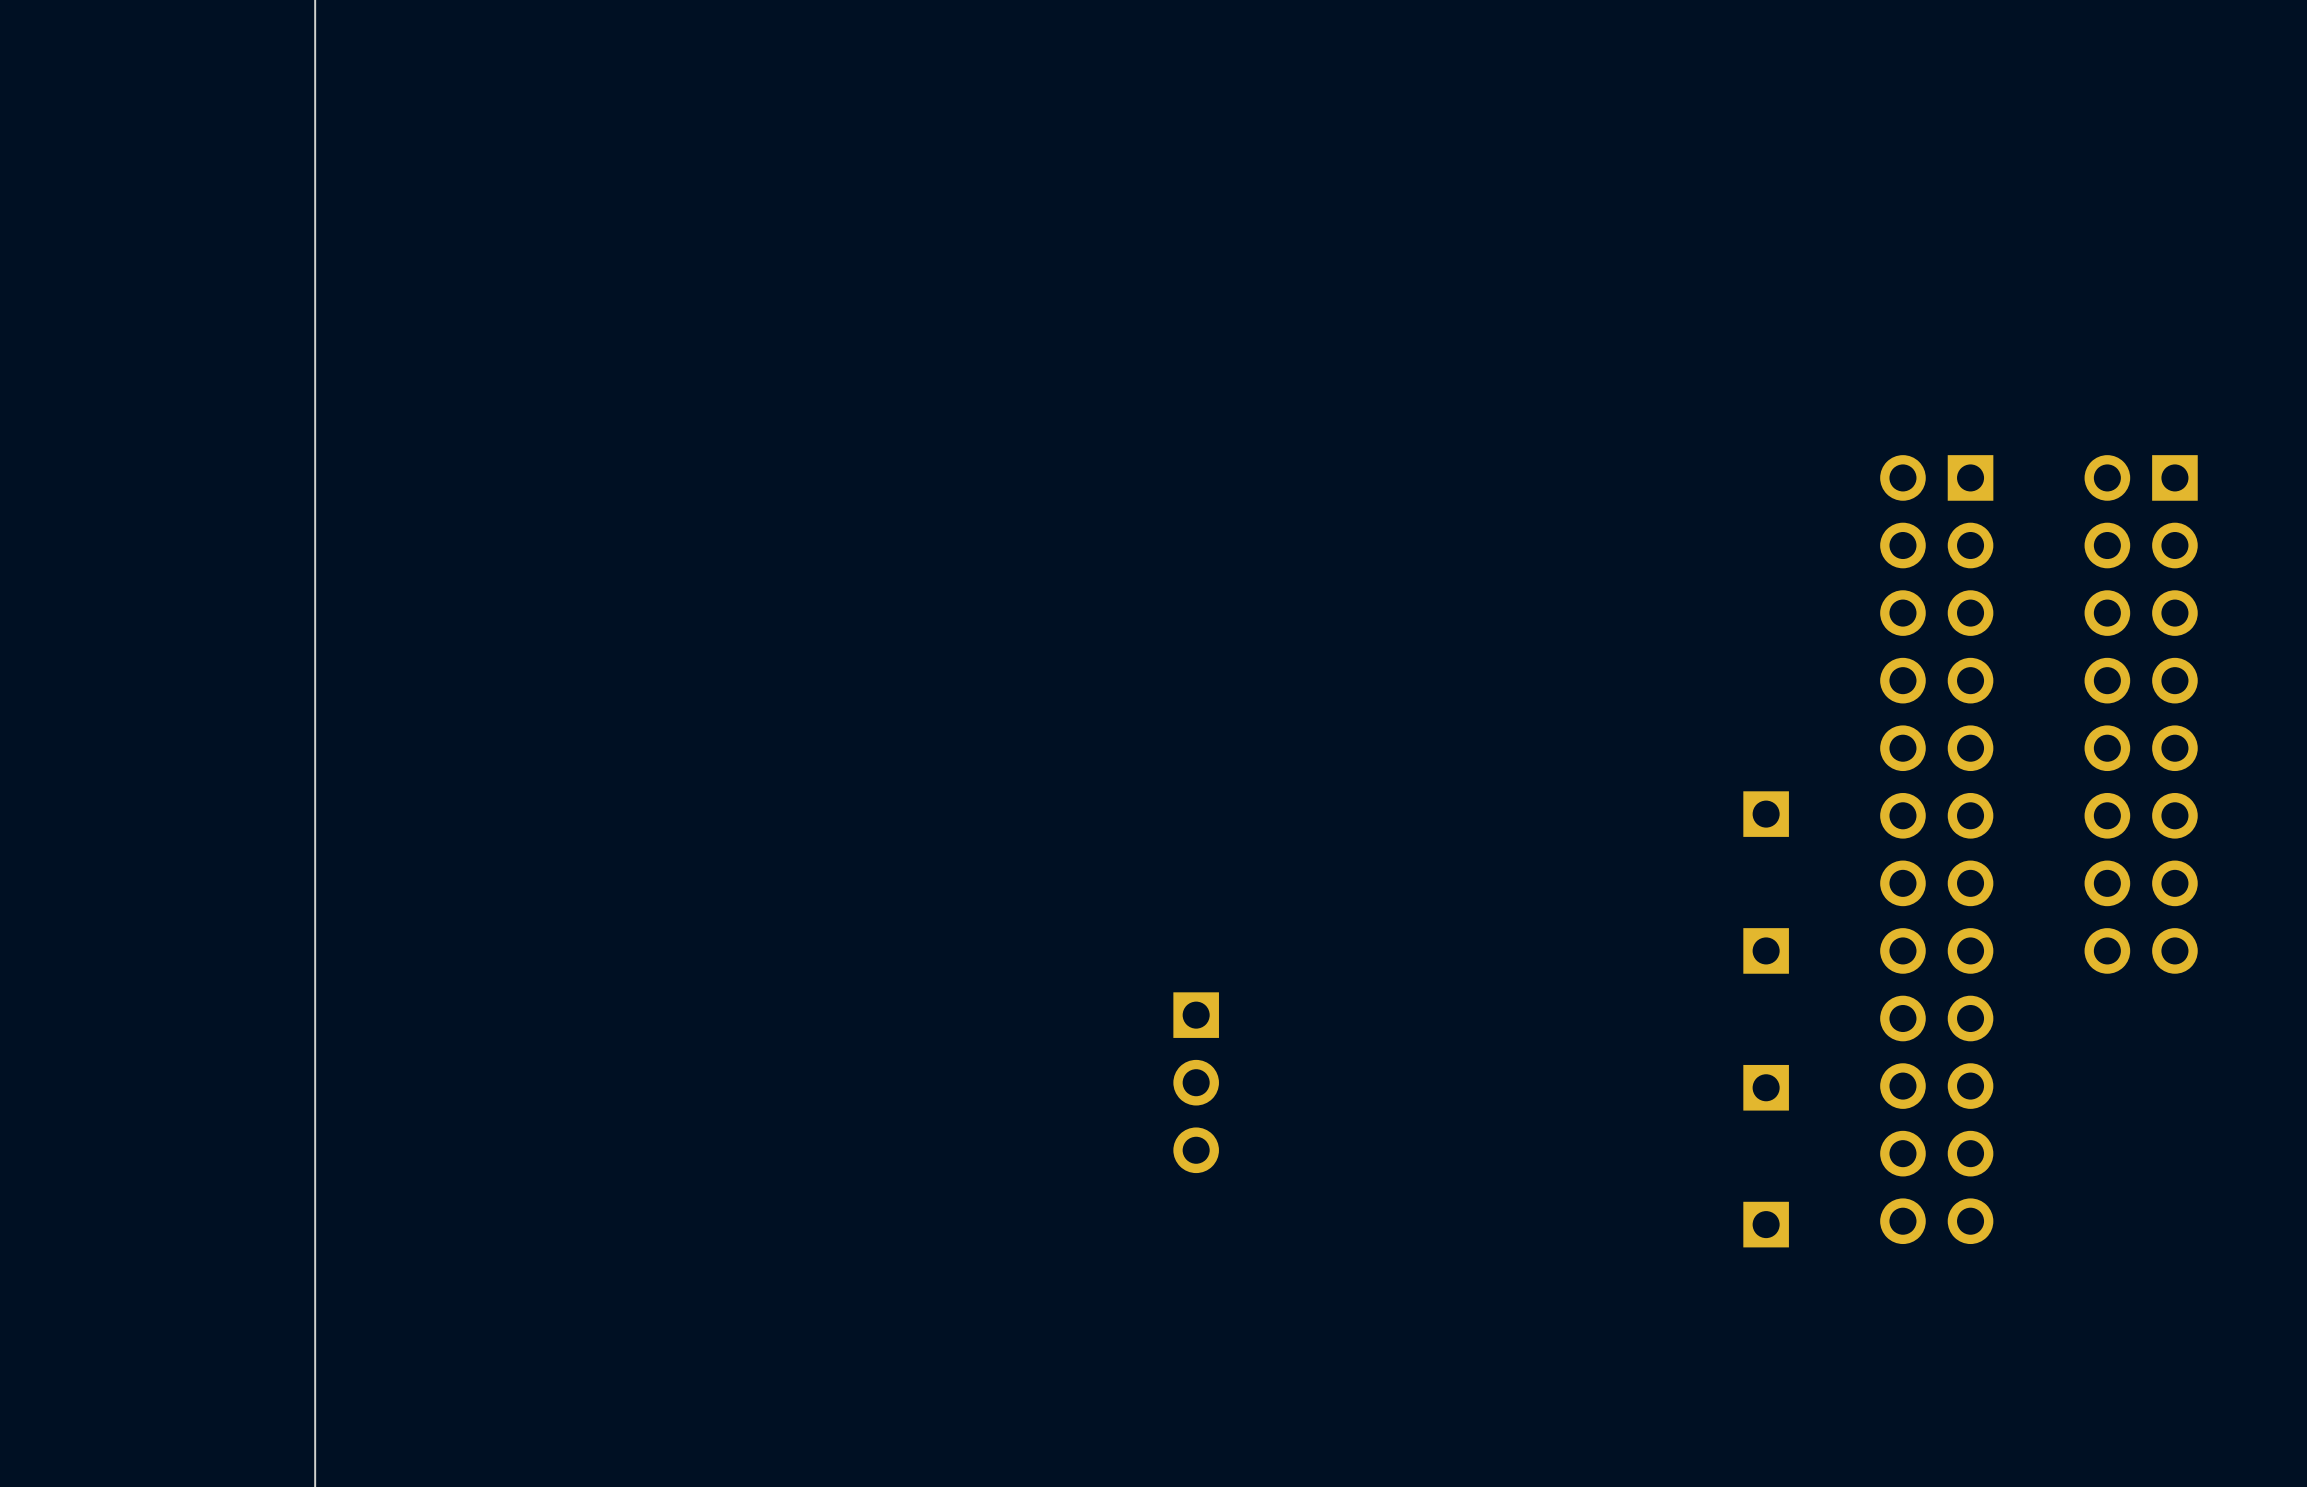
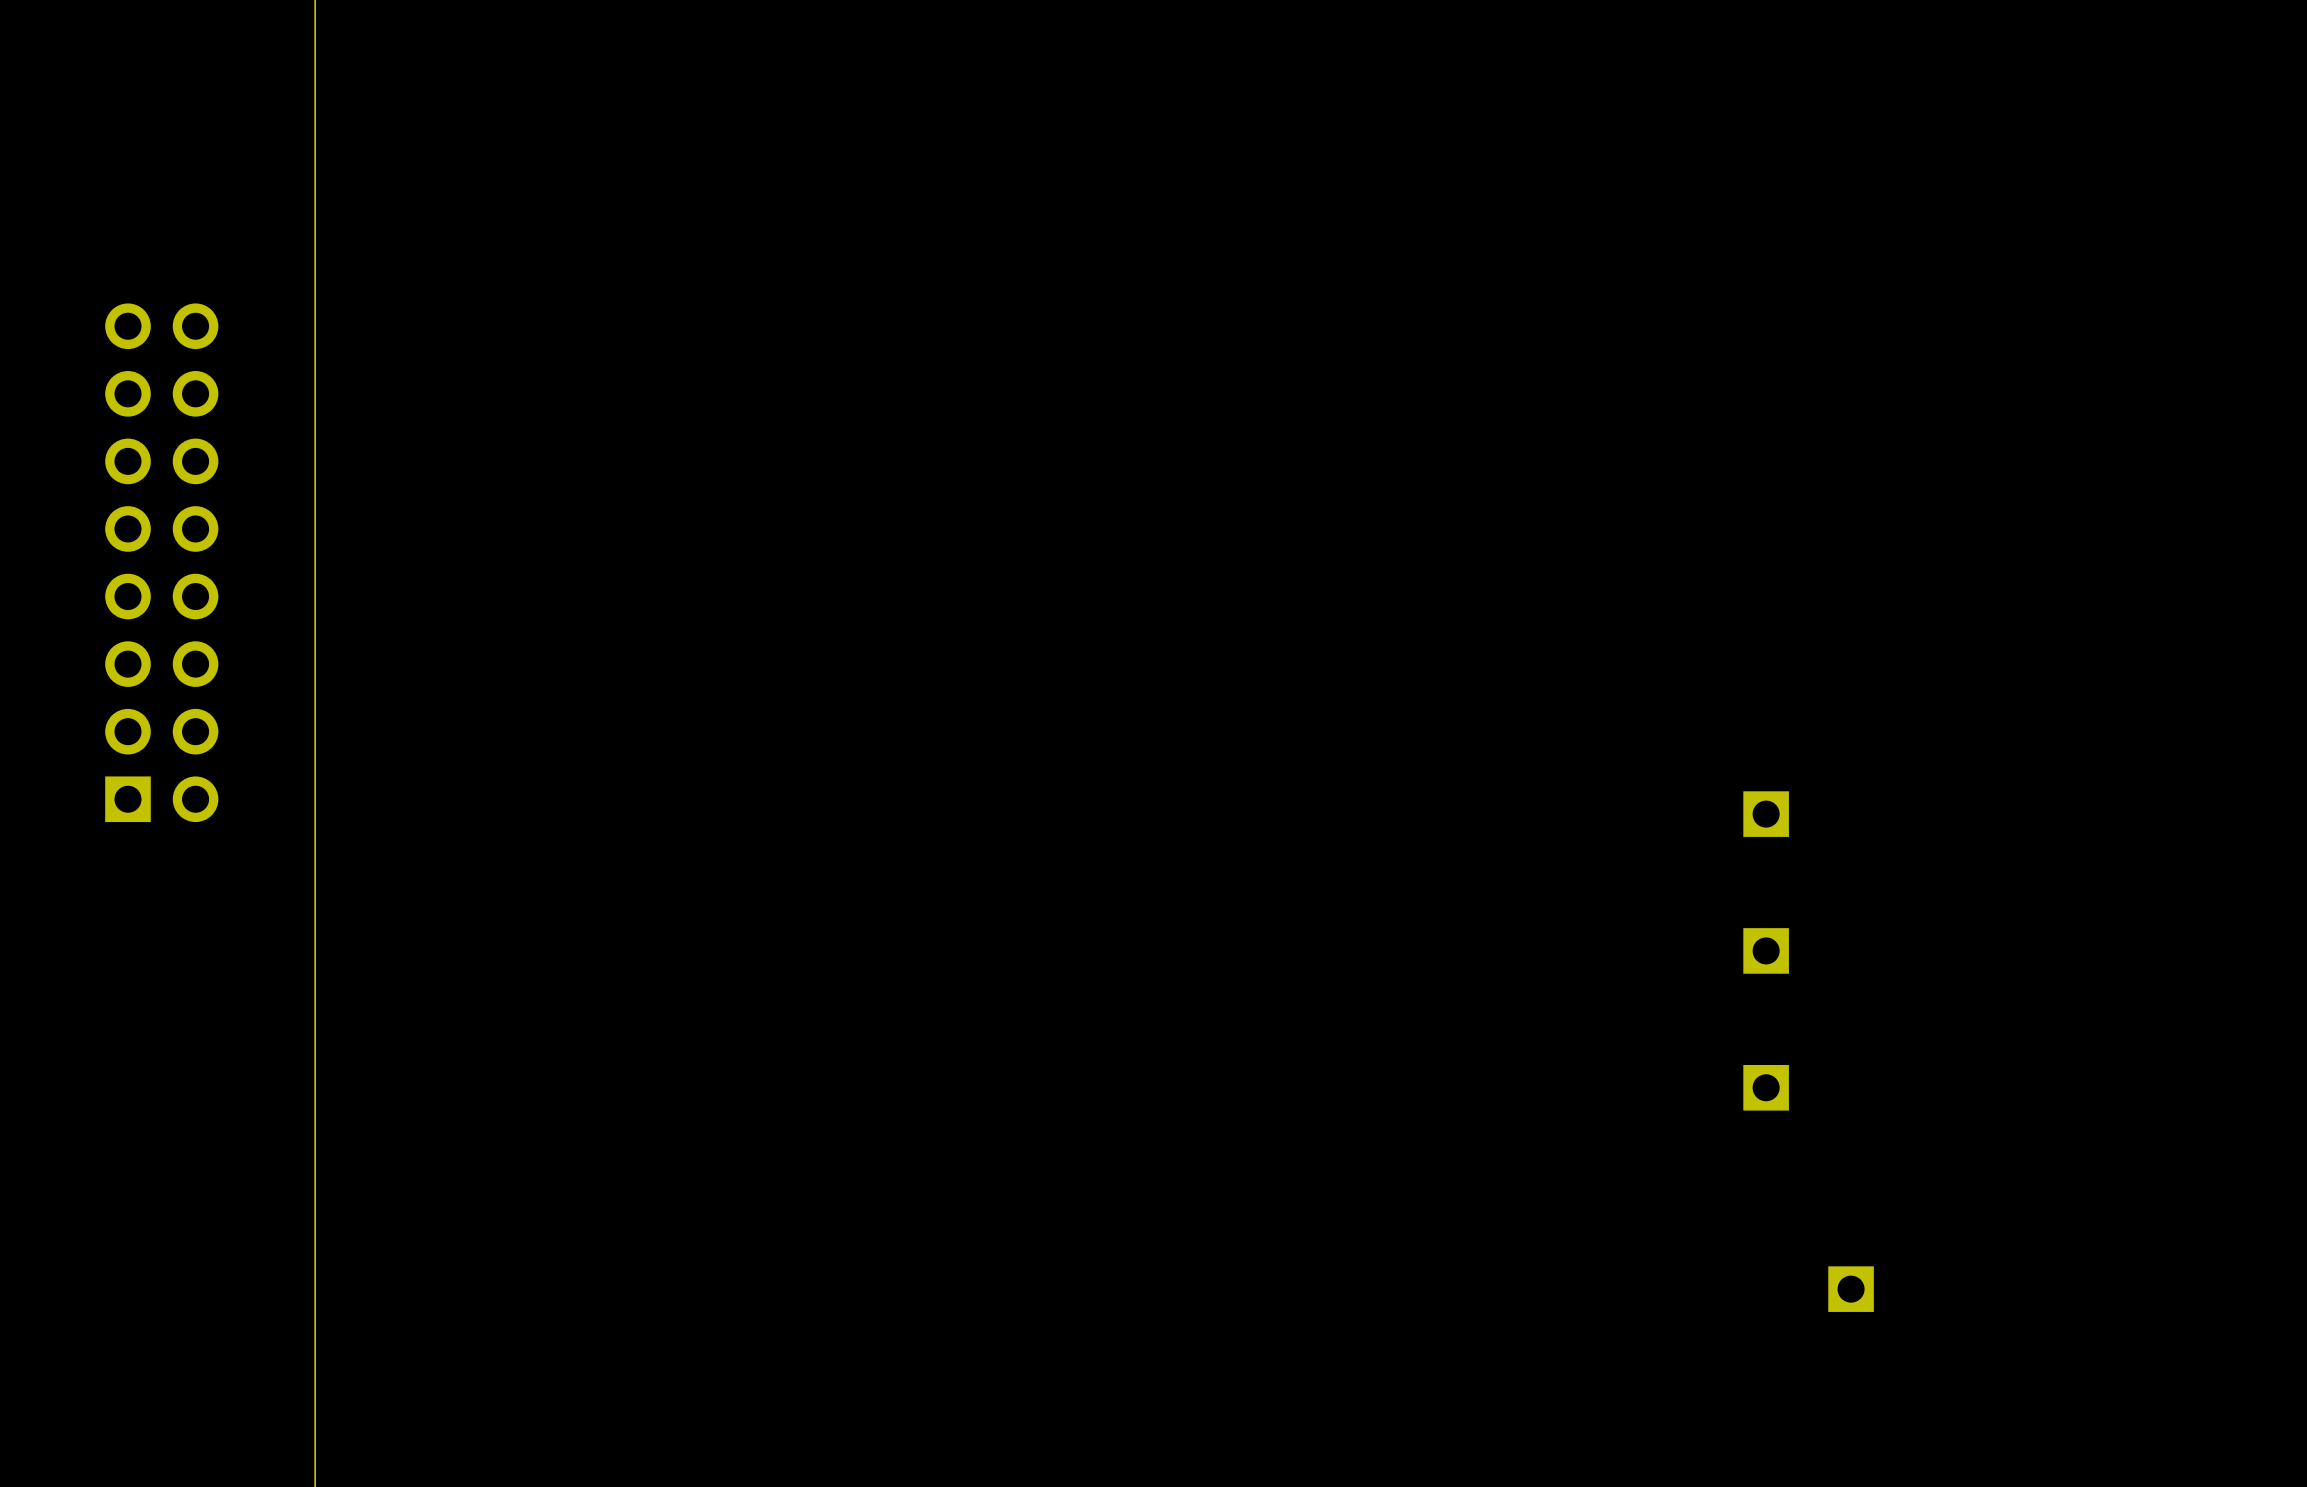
part: none -> (161, 562)
part: (2141, 714) -> none
part: (1936, 849) -> none
part: (1196, 1082) -> none
part position: (1766, 1224) -> (1851, 1289)

